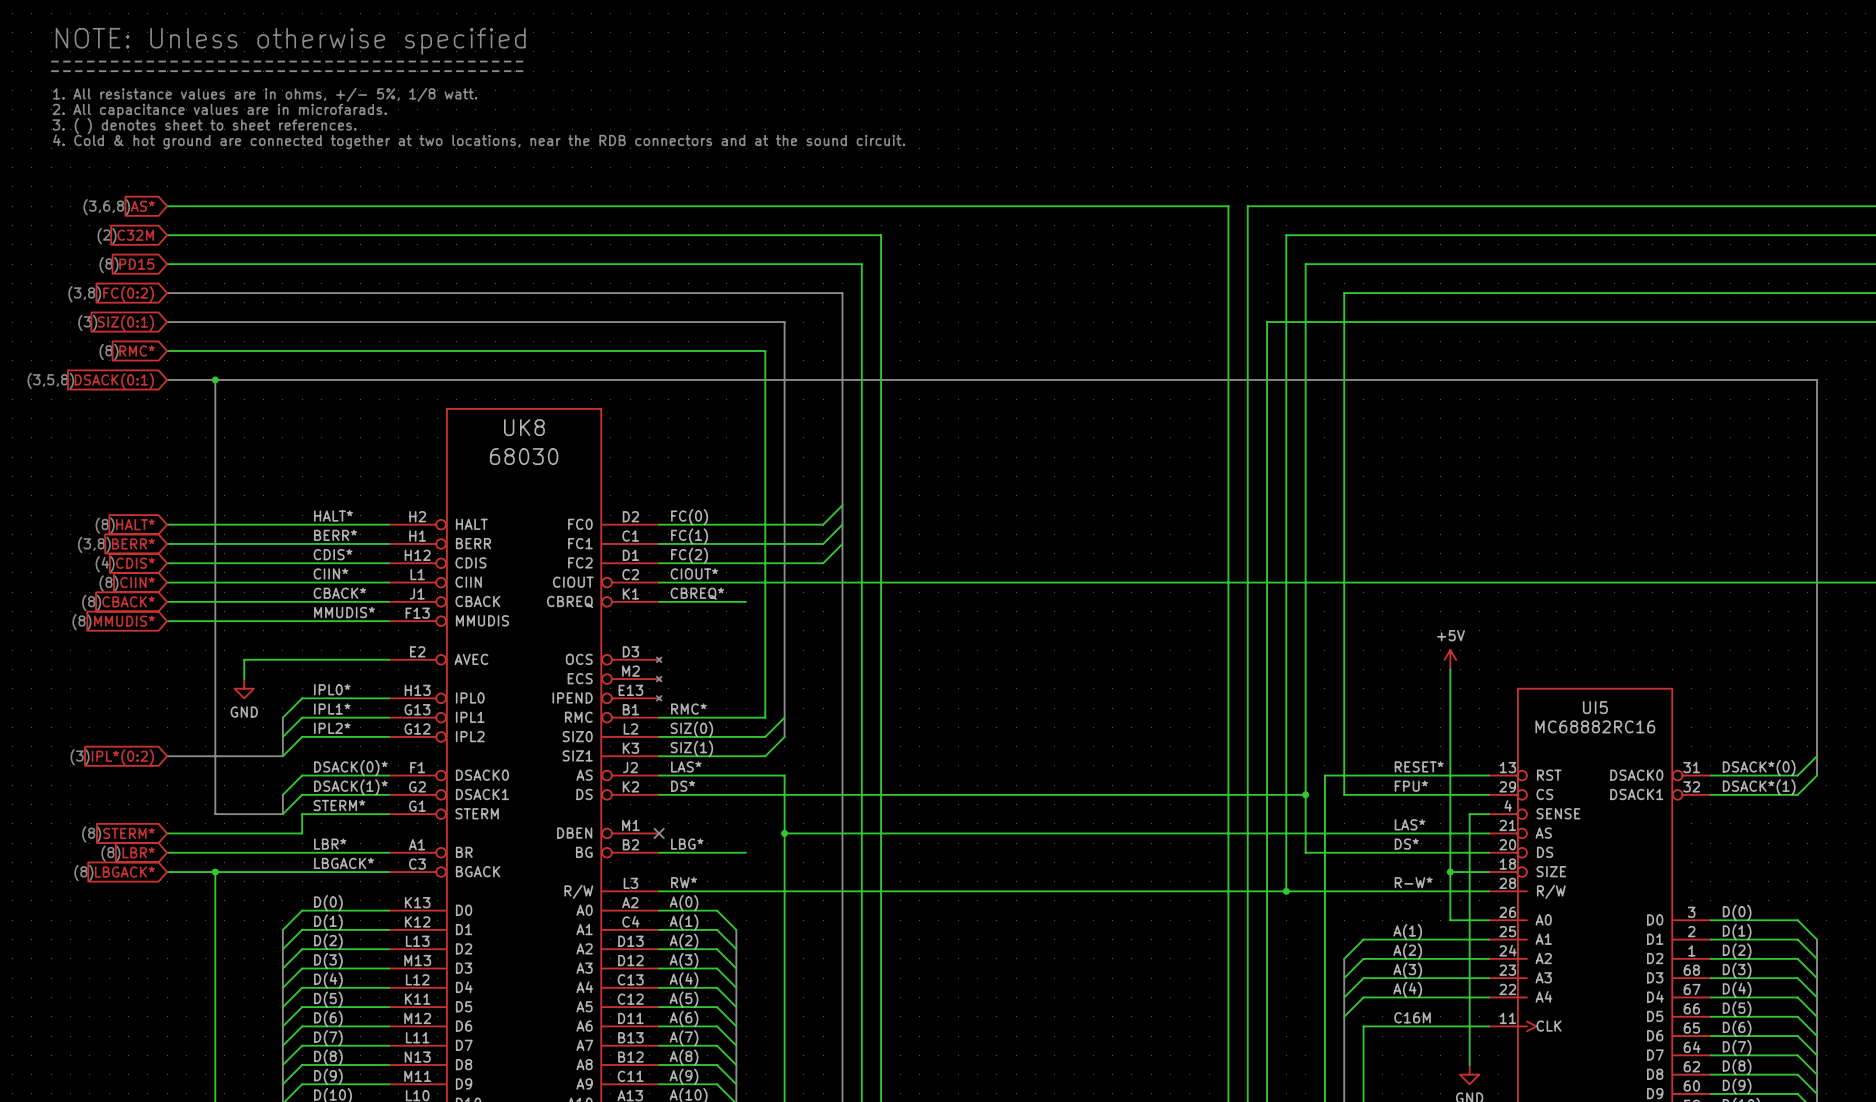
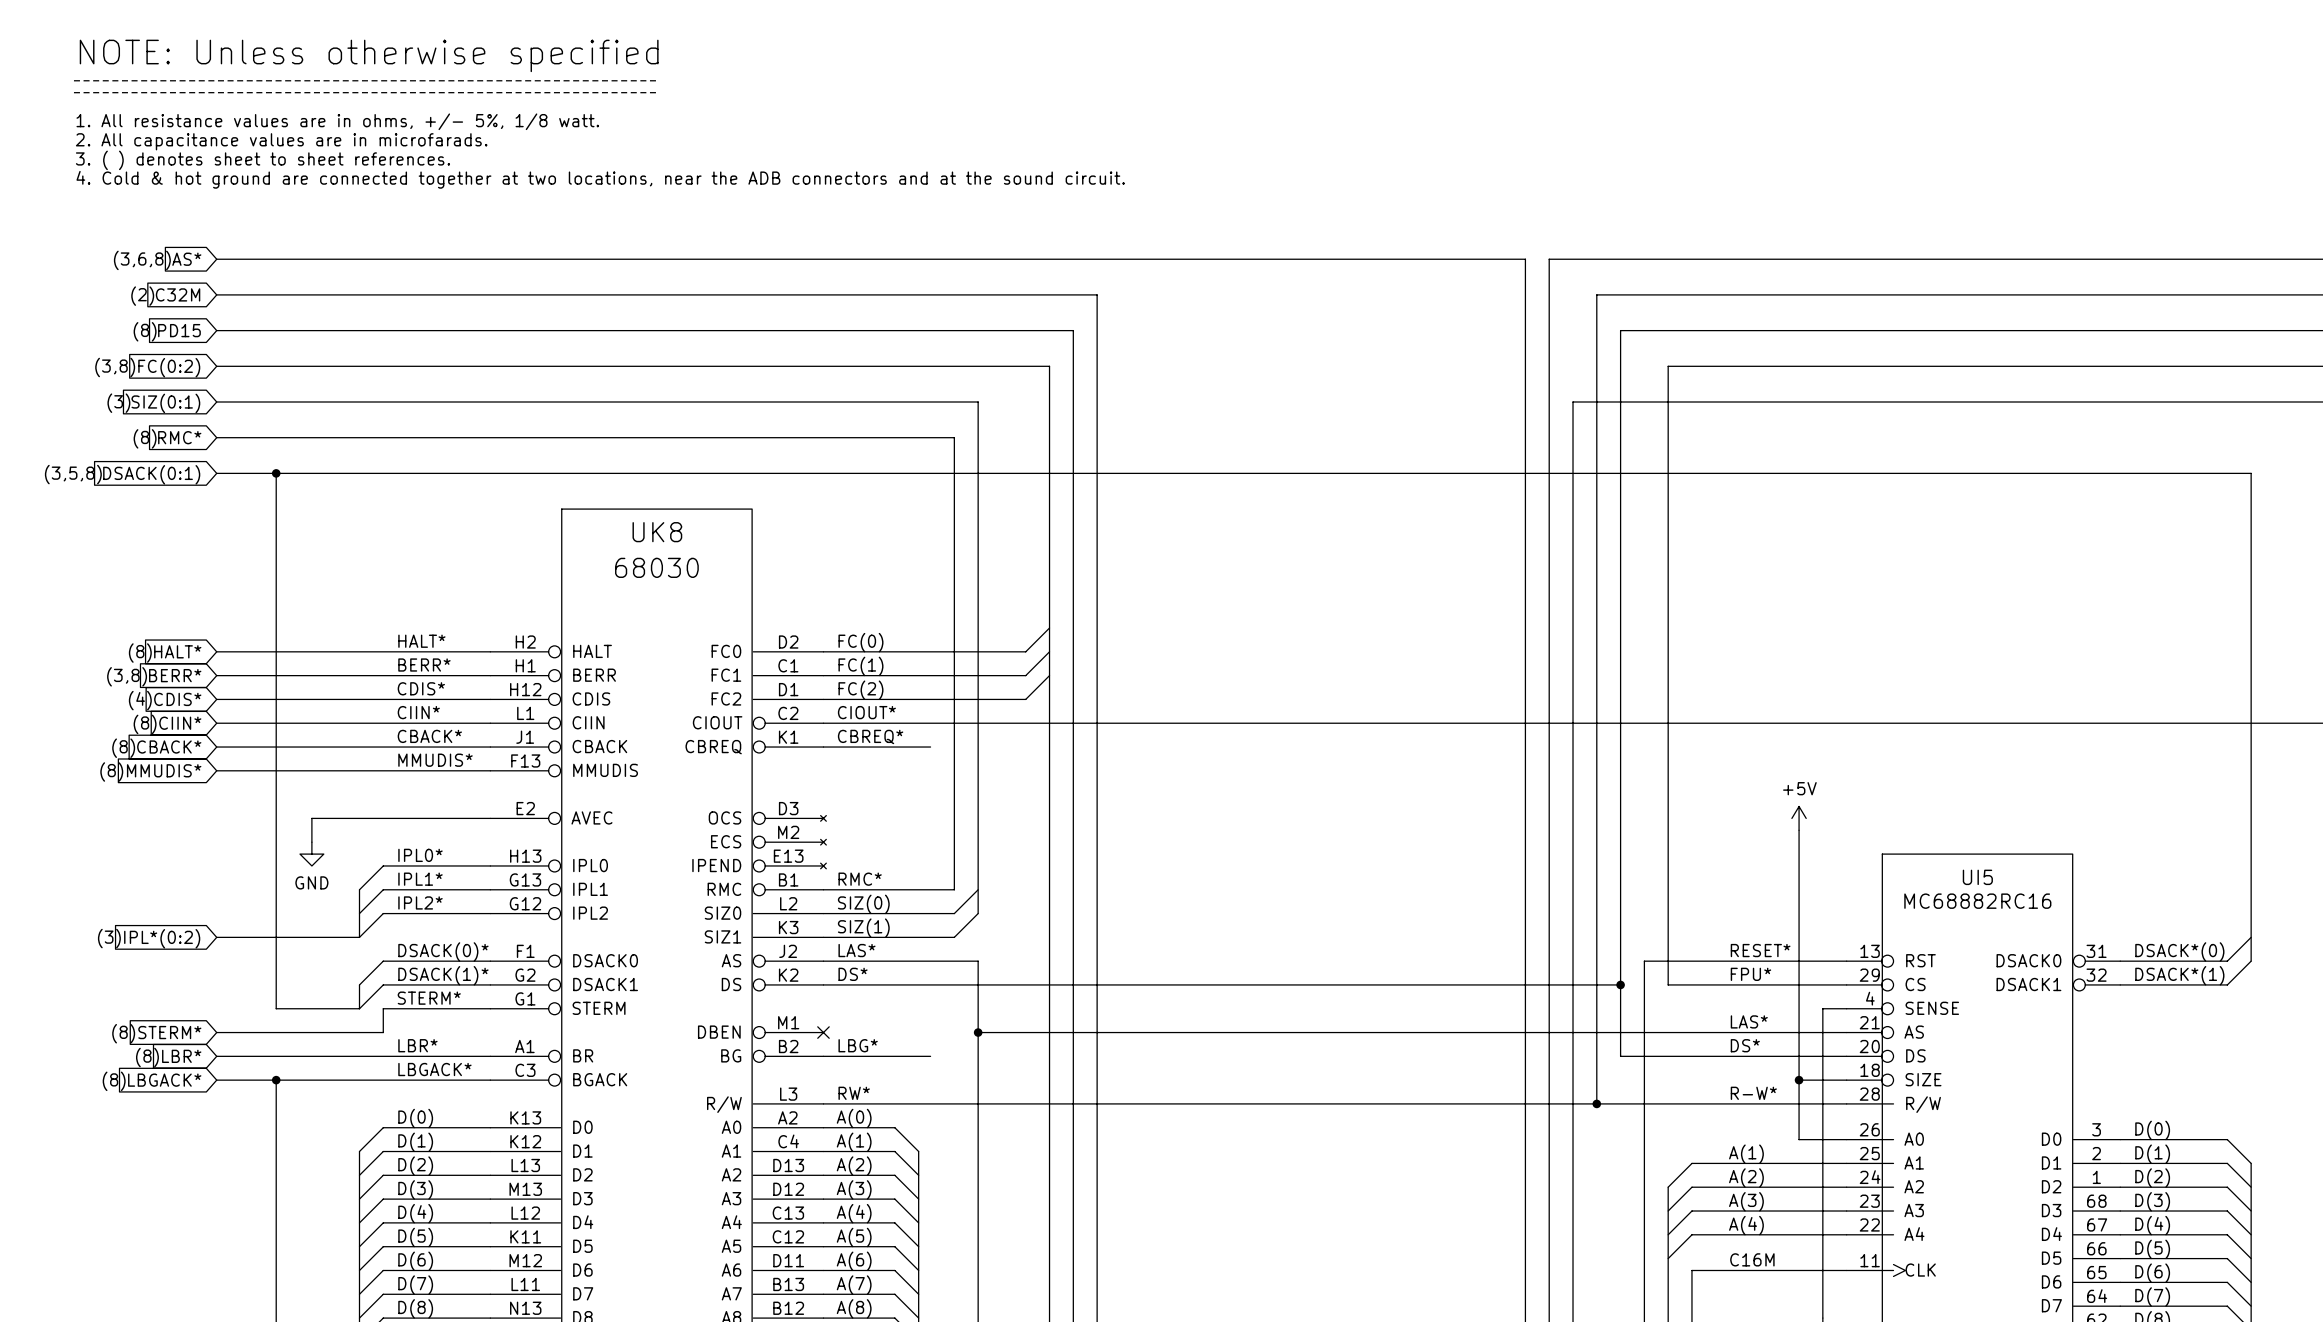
text: 4. Cold & hot ground are connected together at two locations, near the RDB connectors and at the sound circuit. (479, 141) -> 4. Cold & hot ground are connected together at two locations, near the ADB connectors and at the sound circuit. (600, 179)

